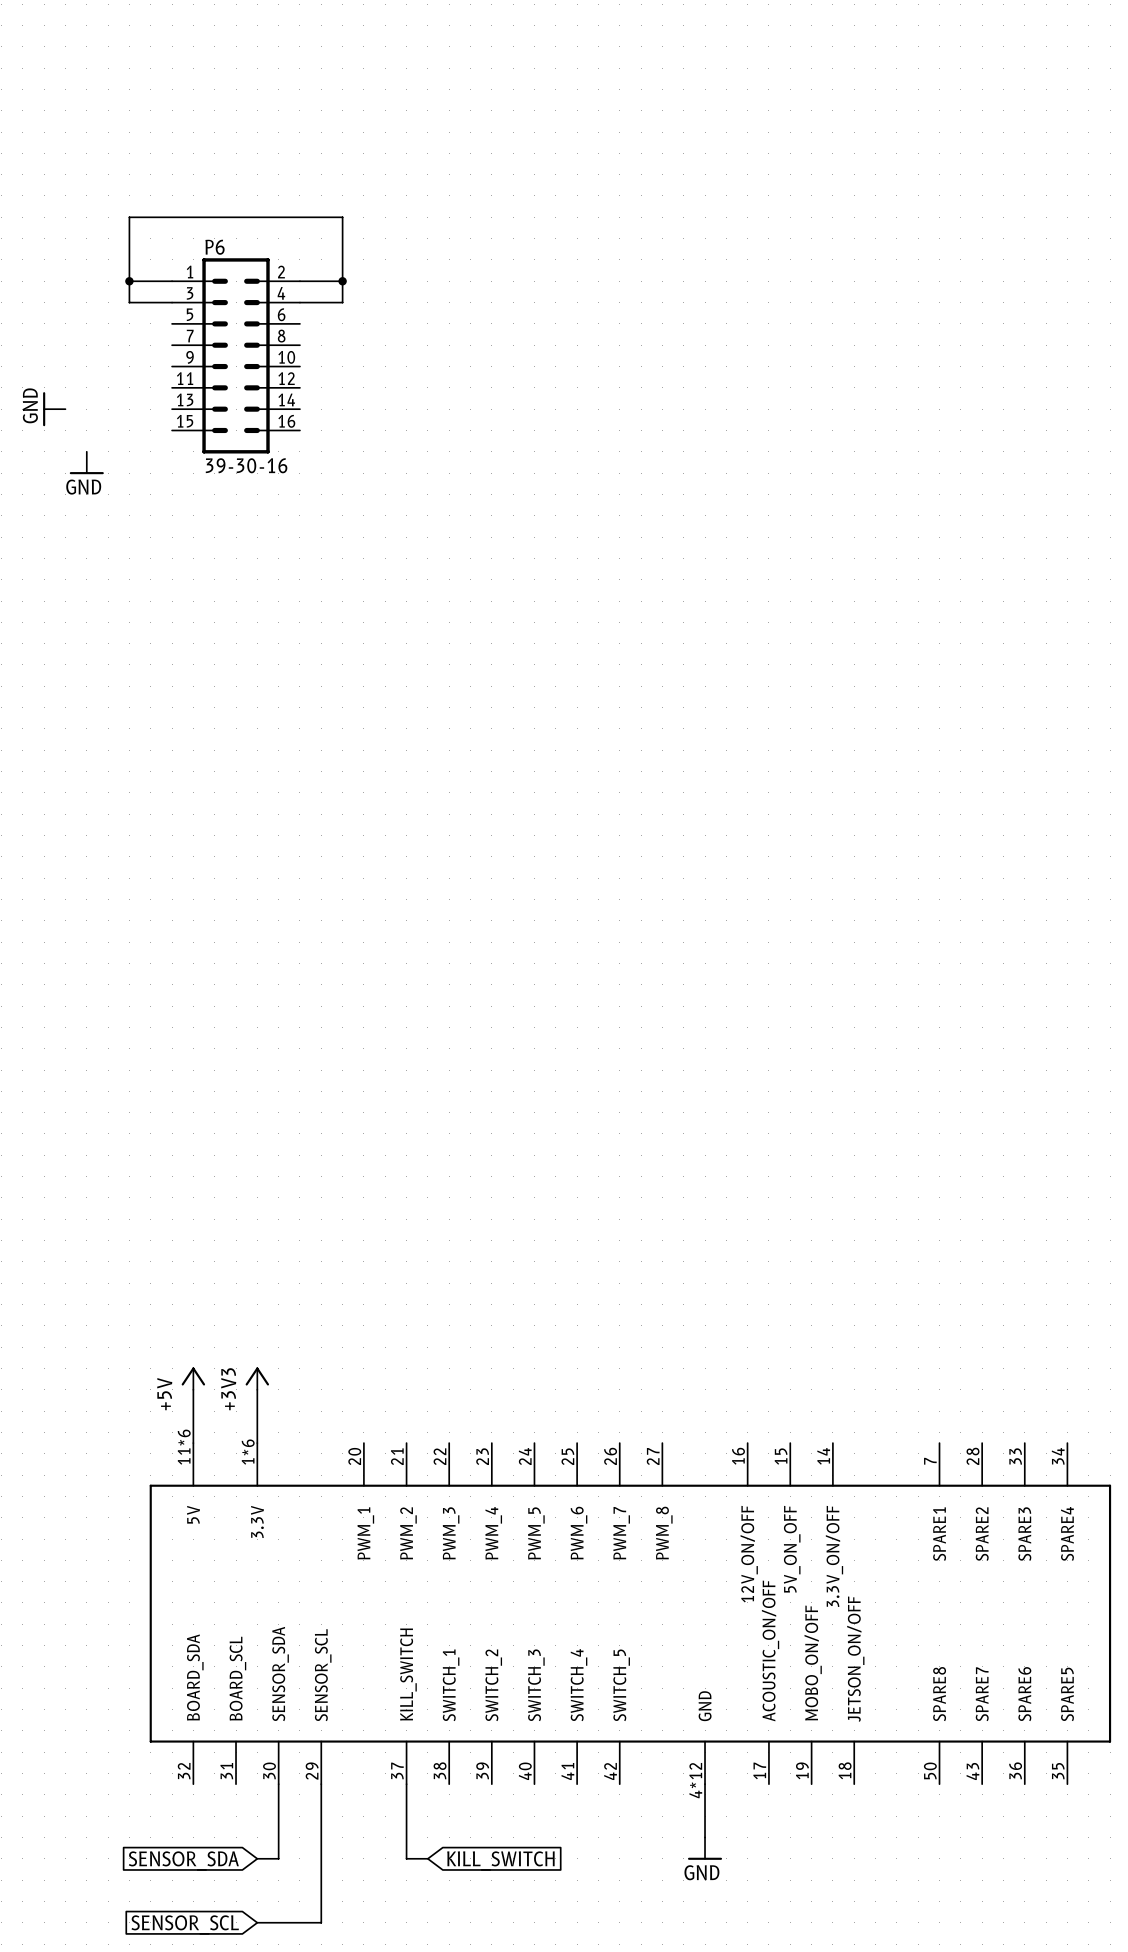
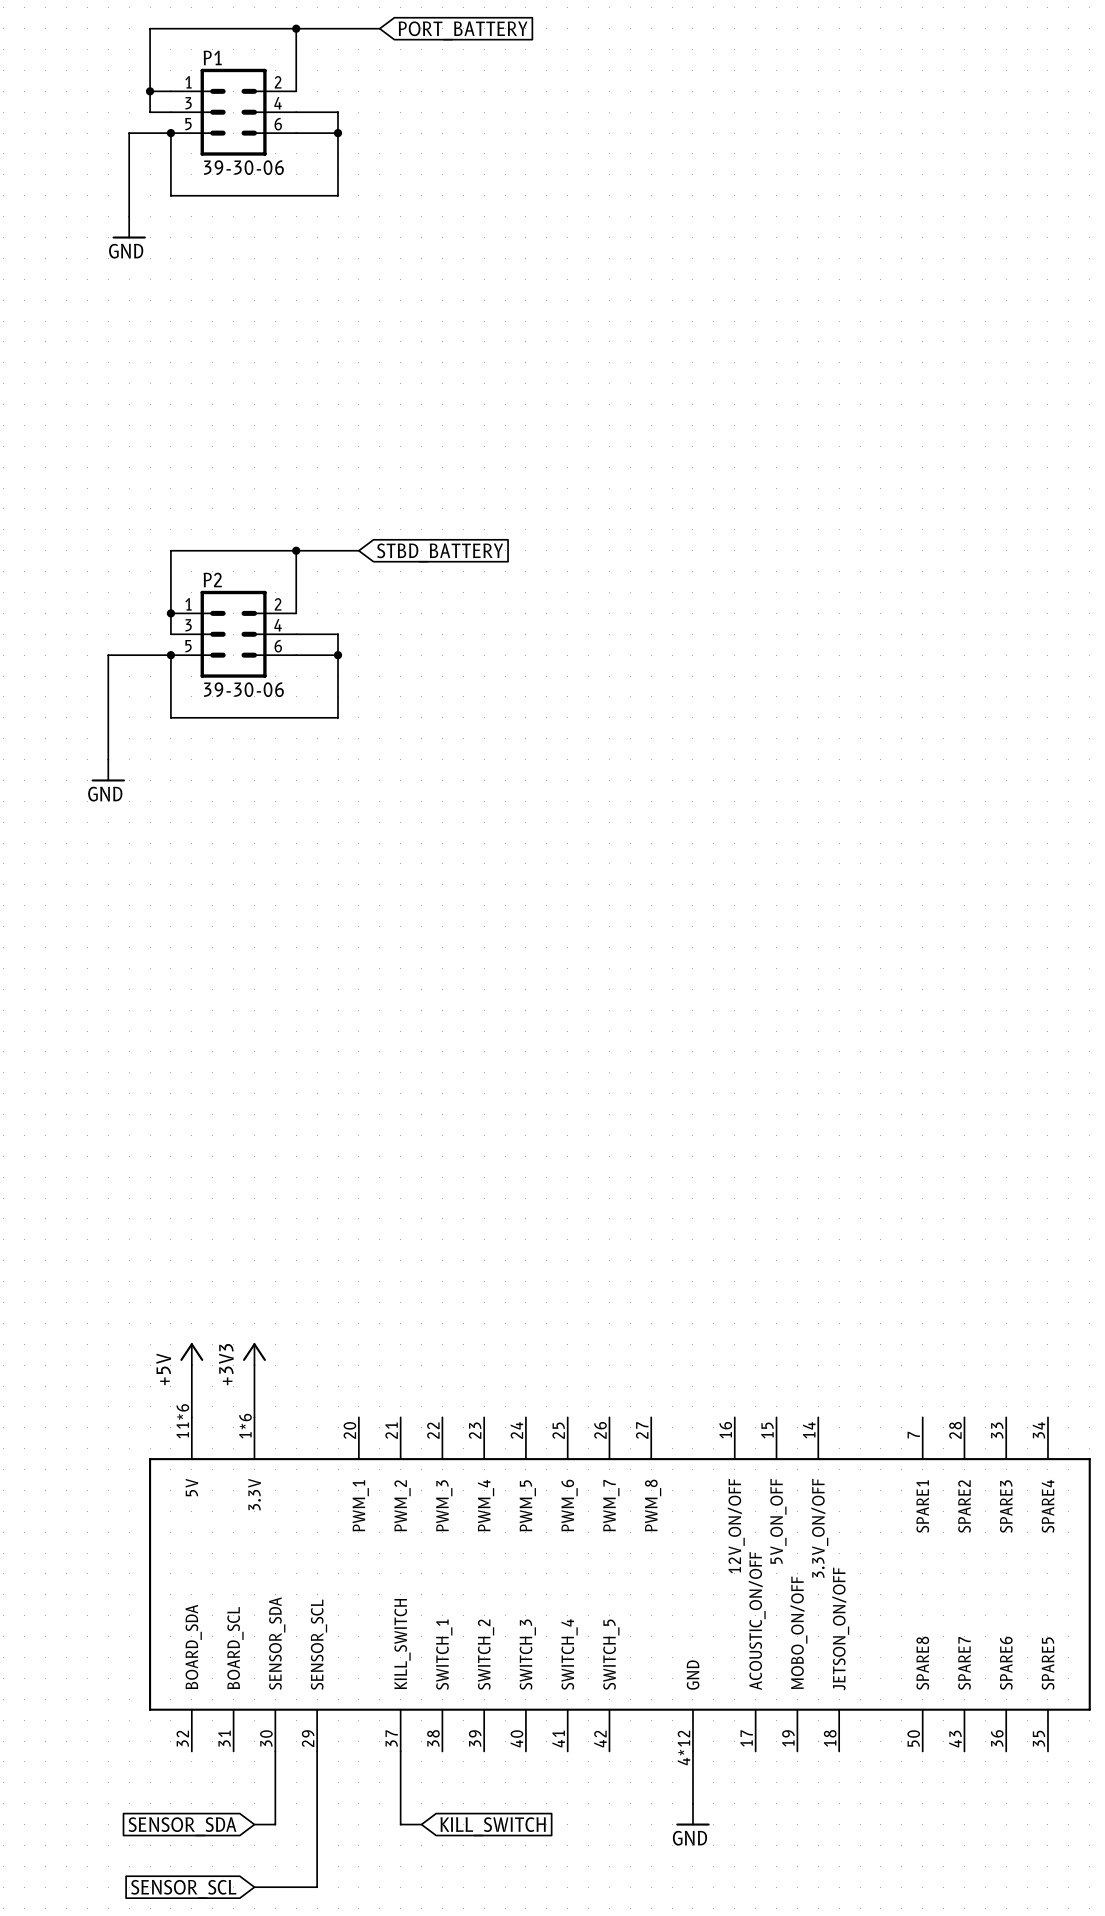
wire: none -> (296, 28) (296, 91)
junction: none -> (296, 28)
wire: none -> (379, 28) (150, 28) (150, 112) (170, 112)
global label: none -> PORT_BATTERY (463, 30)
wire: none -> (150, 91) (170, 91)
junction: none -> (150, 91)
P1: none -> 39-30-06 (233, 112)
wire: none -> (296, 112) (338, 112) (338, 195) (170, 195) (170, 133) (129, 133) (129, 216)
junction: none -> (170, 133)
junction: none -> (338, 133)
power symbol: none -> GND (129, 227)
wire: (129, 281) (172, 281) -> none
junction: (129, 281) -> none
wire: (299, 281) (342, 281) -> (296, 133) (338, 133)
junction: (342, 281) -> none
wire: (172, 302) (129, 302) (129, 217) (342, 217) (342, 302) (299, 302) -> none
P6: 39-30-16 (236, 355) -> none
power symbol: GND (54, 409) -> none
power symbol: GND (86, 463) -> none
wire: none -> (296, 550) (296, 613)
junction: none -> (296, 550)
wire: none -> (358, 550) (170, 550) (170, 634)
global label: none -> STBD_BATTERY (440, 552)
junction: none -> (170, 613)
P2: none -> 39-30-06 (233, 634)
wire: none -> (296, 634) (338, 634) (338, 717) (170, 717) (170, 655) (108, 655) (108, 759)
junction: none -> (170, 655)
wire: none -> (296, 655) (338, 655)
junction: none -> (338, 655)
power symbol: none -> GND (108, 770)

